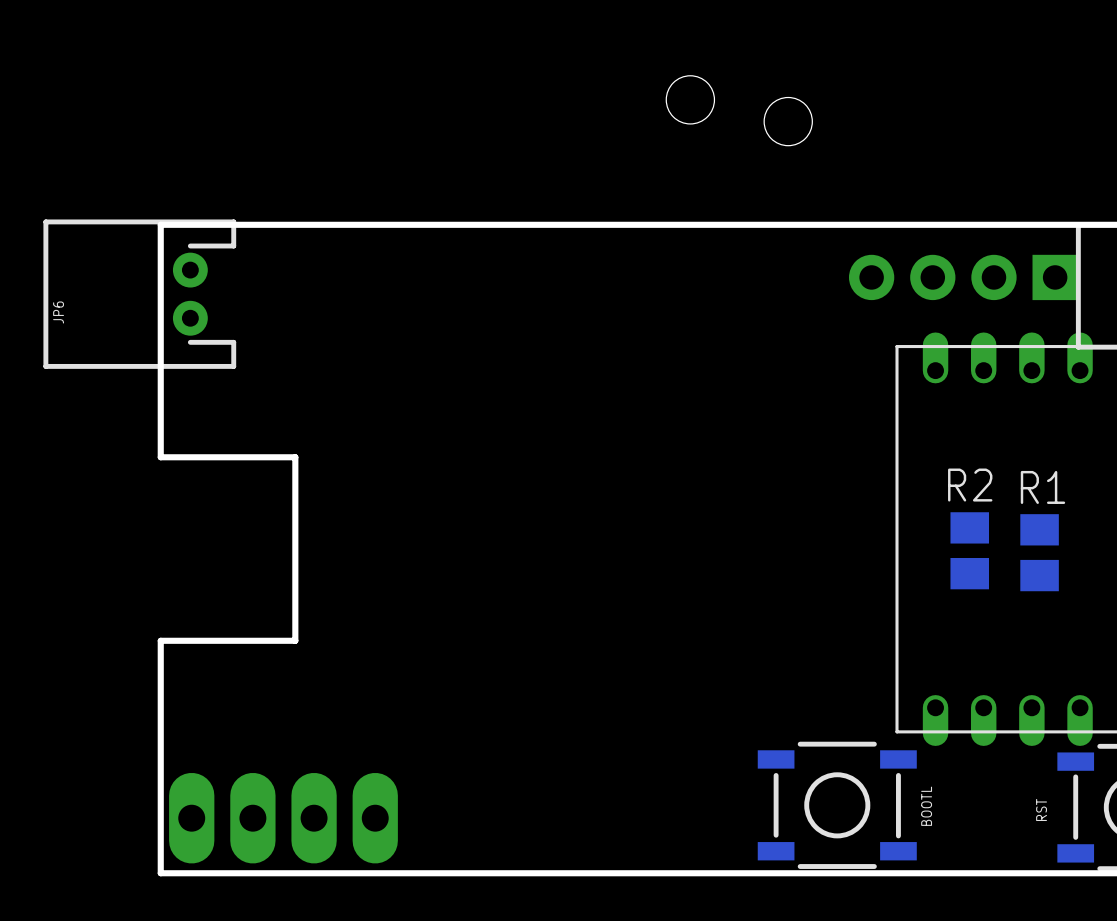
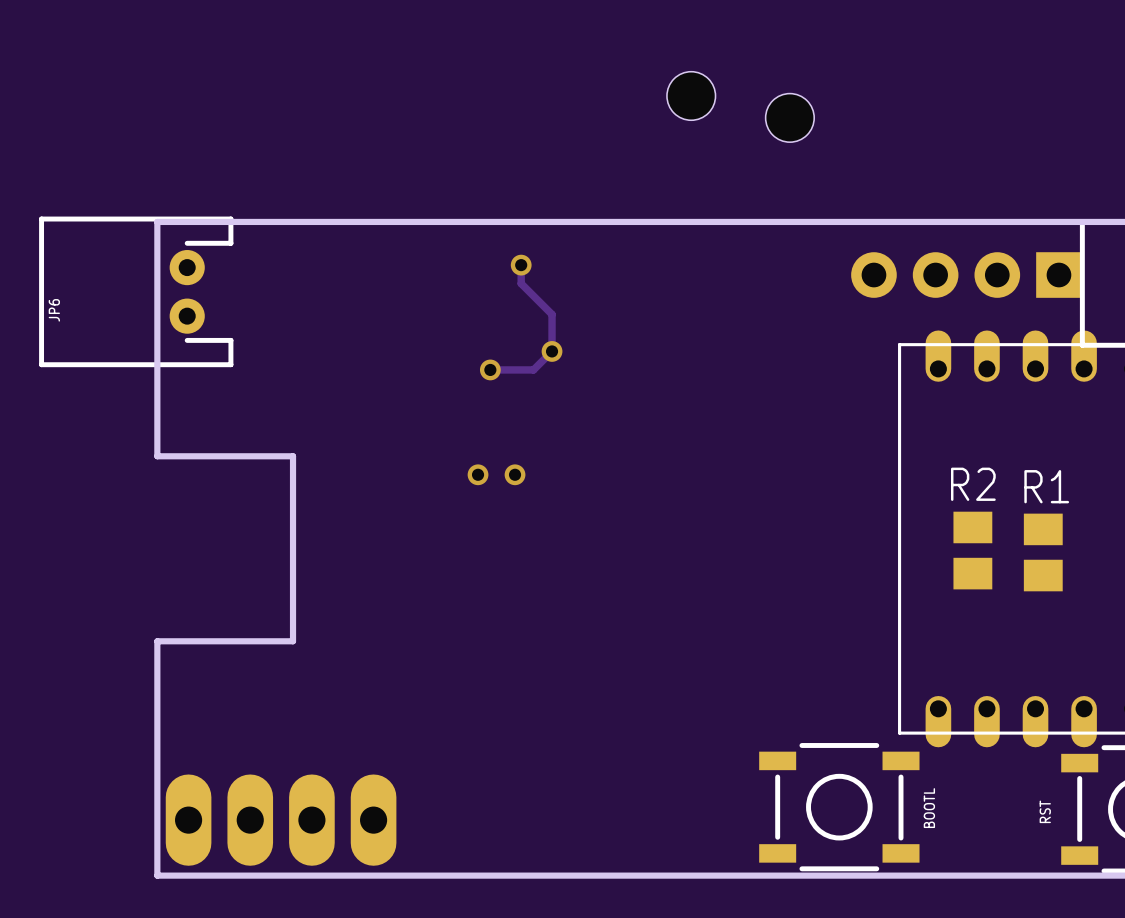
track: none -> (521, 265) (521, 283) (552, 314) (552, 351) (533, 369) (490, 369)
via: none -> (521, 265)
via: none -> (552, 351)
via: none -> (490, 369)
via: none -> (478, 474)
via: none -> (515, 474)

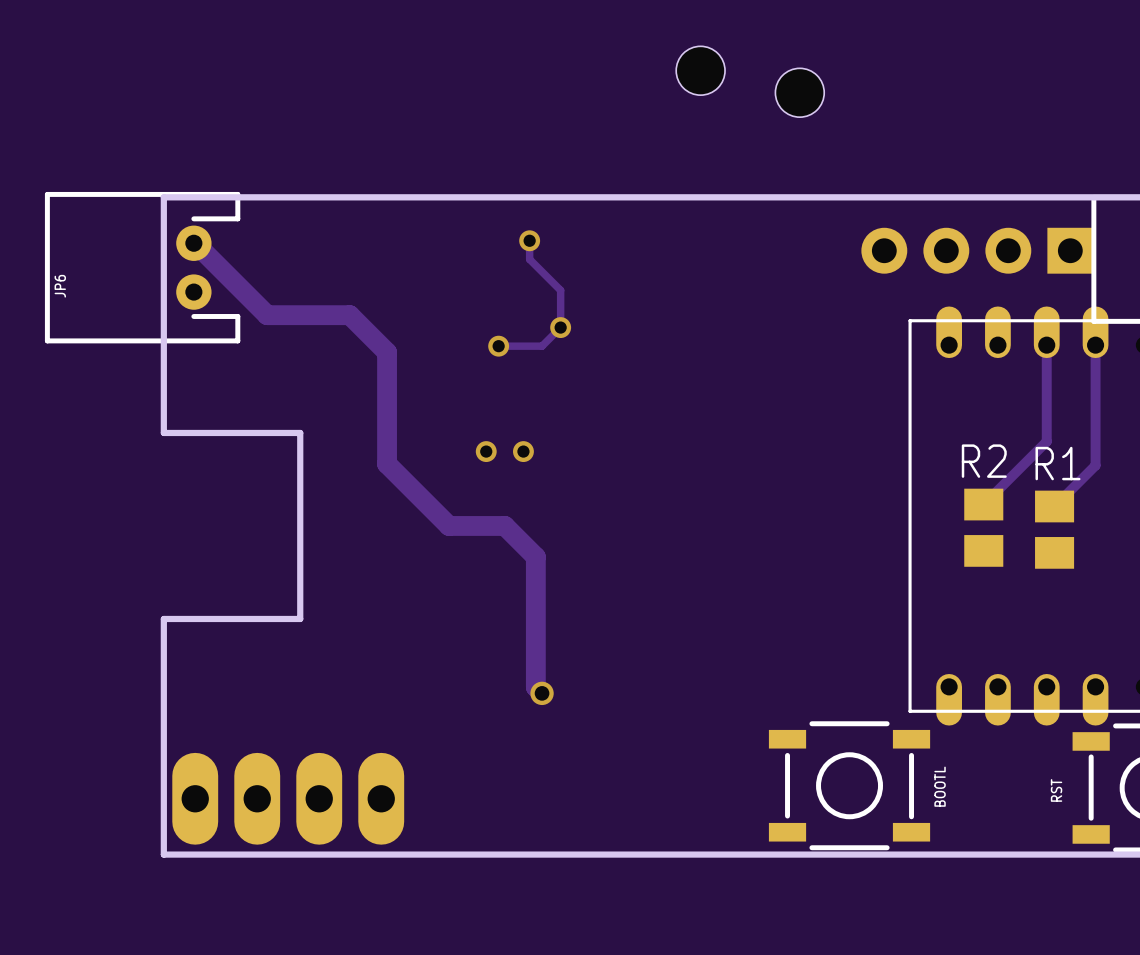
track: none -> (193, 243) (267, 315) (349, 315) (387, 352) (387, 463) (449, 525) (504, 525) (535, 556) (535, 687) (542, 693)
track: none -> (1046, 345) (1046, 441) (983, 504)
track: none -> (1095, 345) (1095, 465) (1054, 506)
via: none -> (542, 693)

